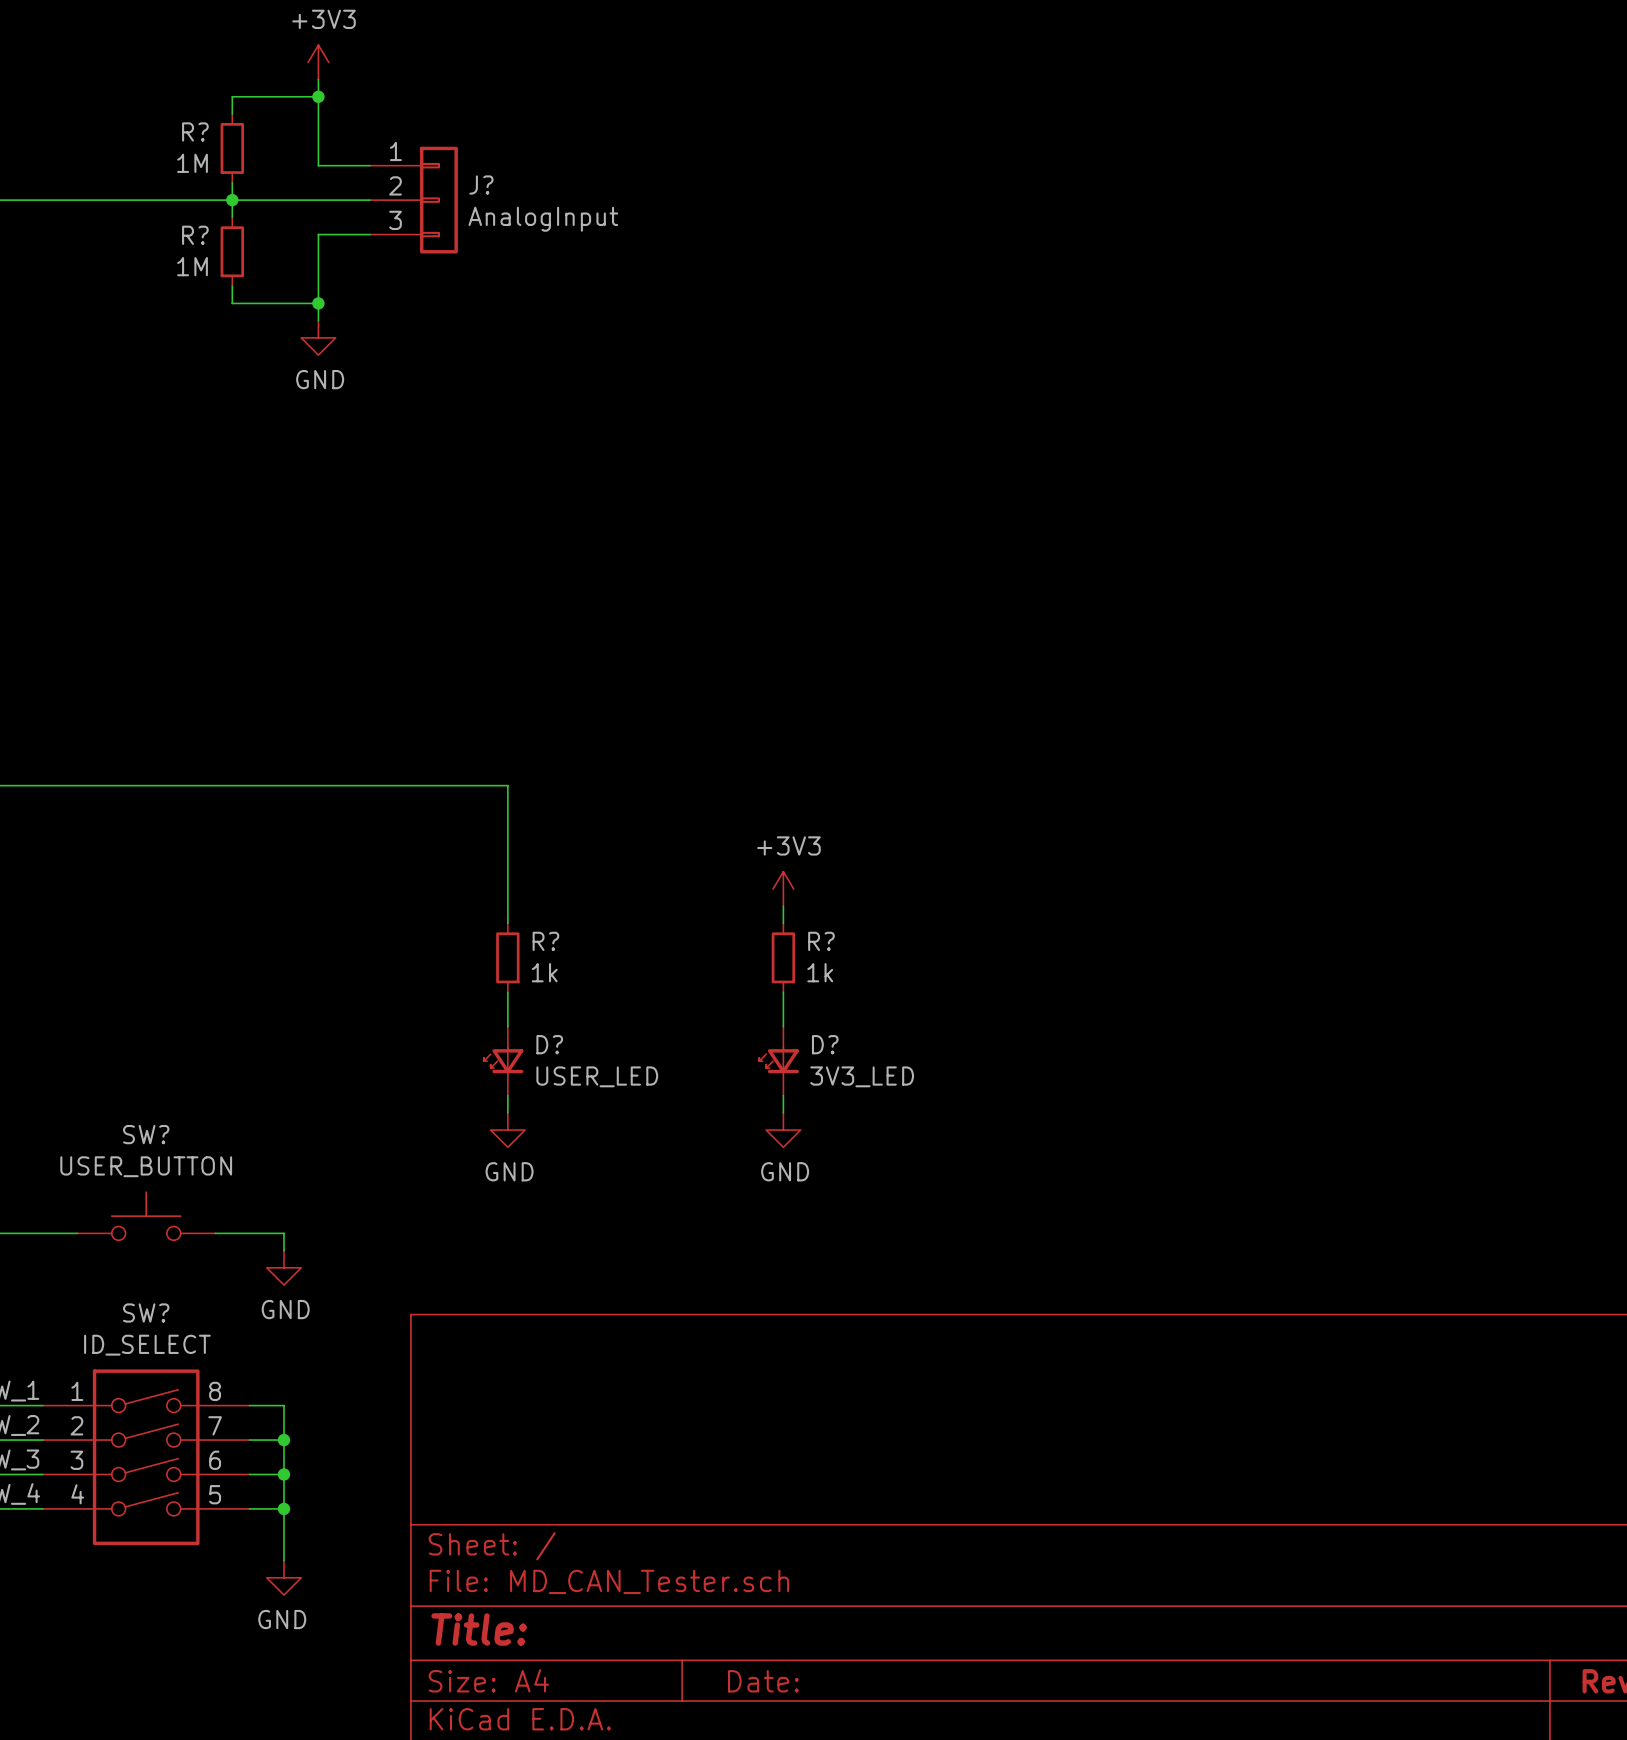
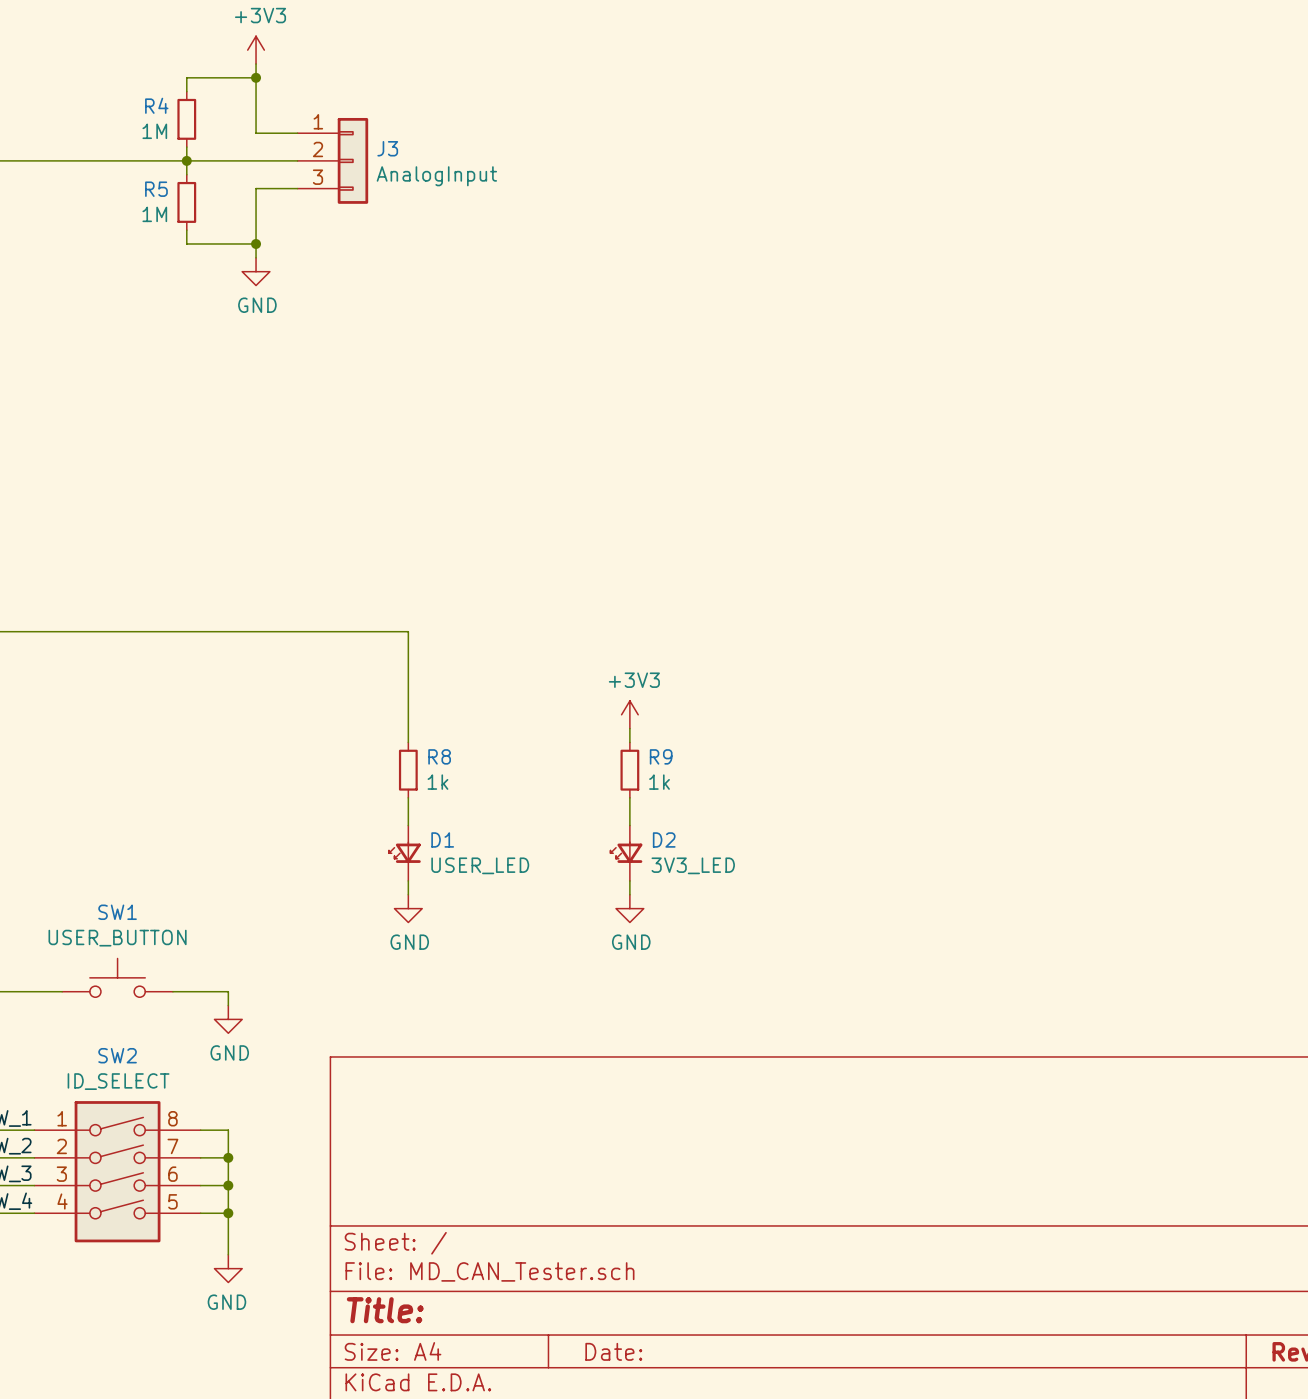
R? name: R? (195, 131) -> R4 (156, 105)
J? name: J? (481, 185) -> J3 (387, 148)
R? name: R? (195, 235) -> R5 (156, 189)
R? name: R? (545, 941) -> R8 (439, 756)
R? name: R? (821, 941) -> R9 (661, 756)
D? name: D? (549, 1044) -> D1 (442, 839)
D? name: D? (825, 1044) -> D2 (664, 839)
SW? name: SW? (146, 1134) -> SW1 (117, 912)
SW? name: SW? (146, 1312) -> SW2 (117, 1055)

